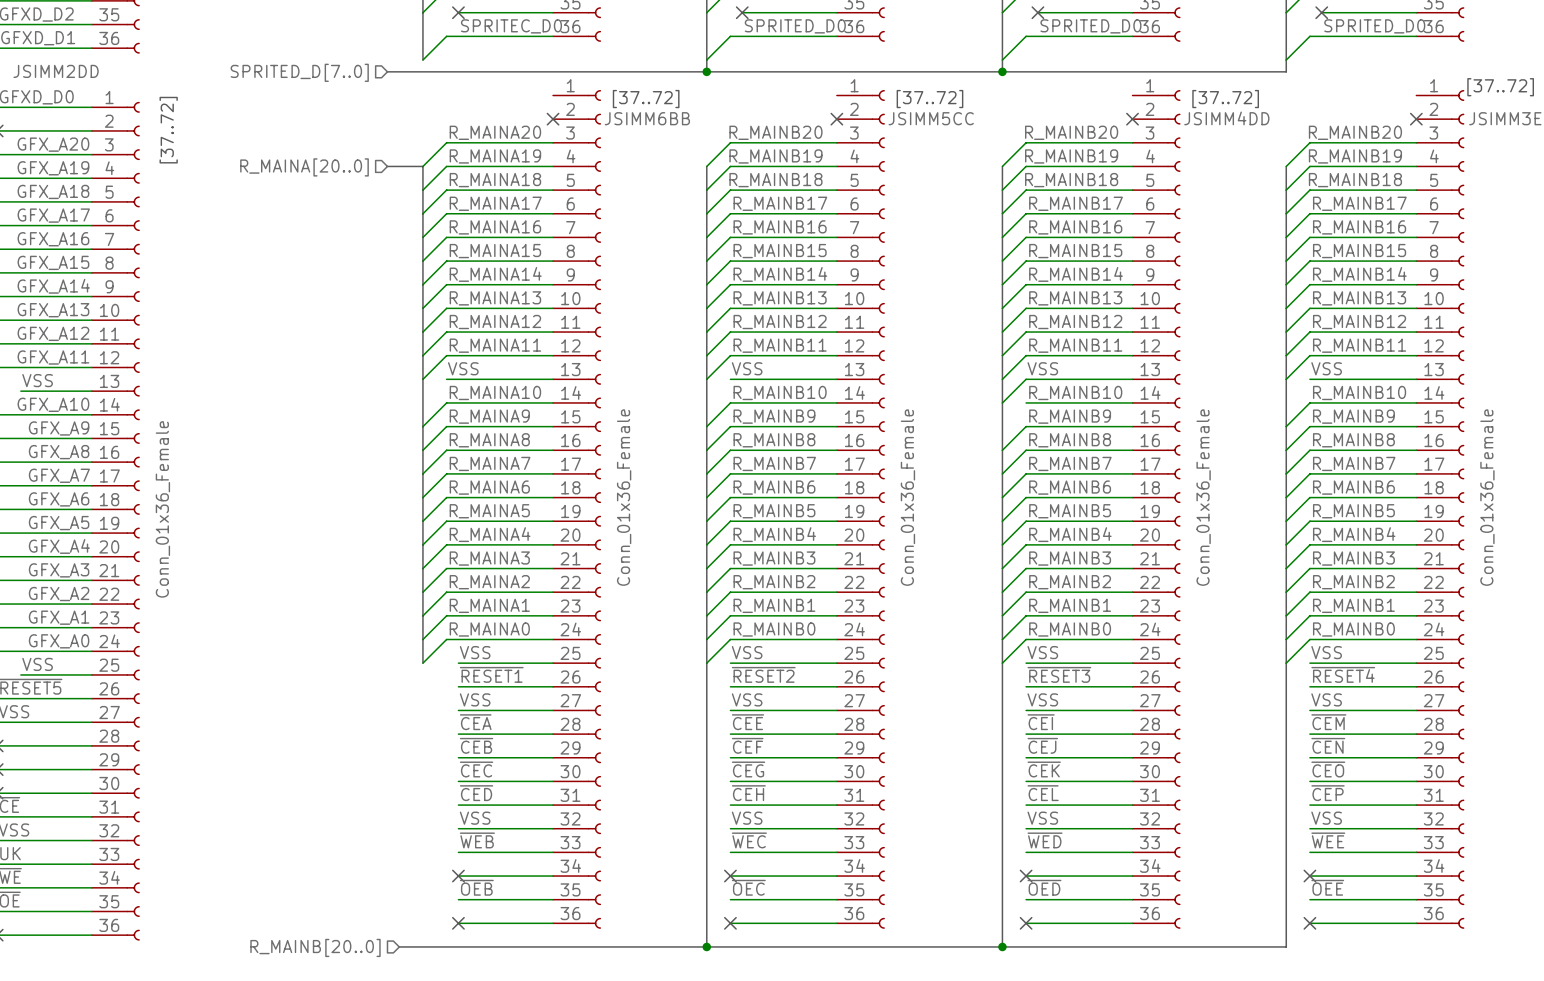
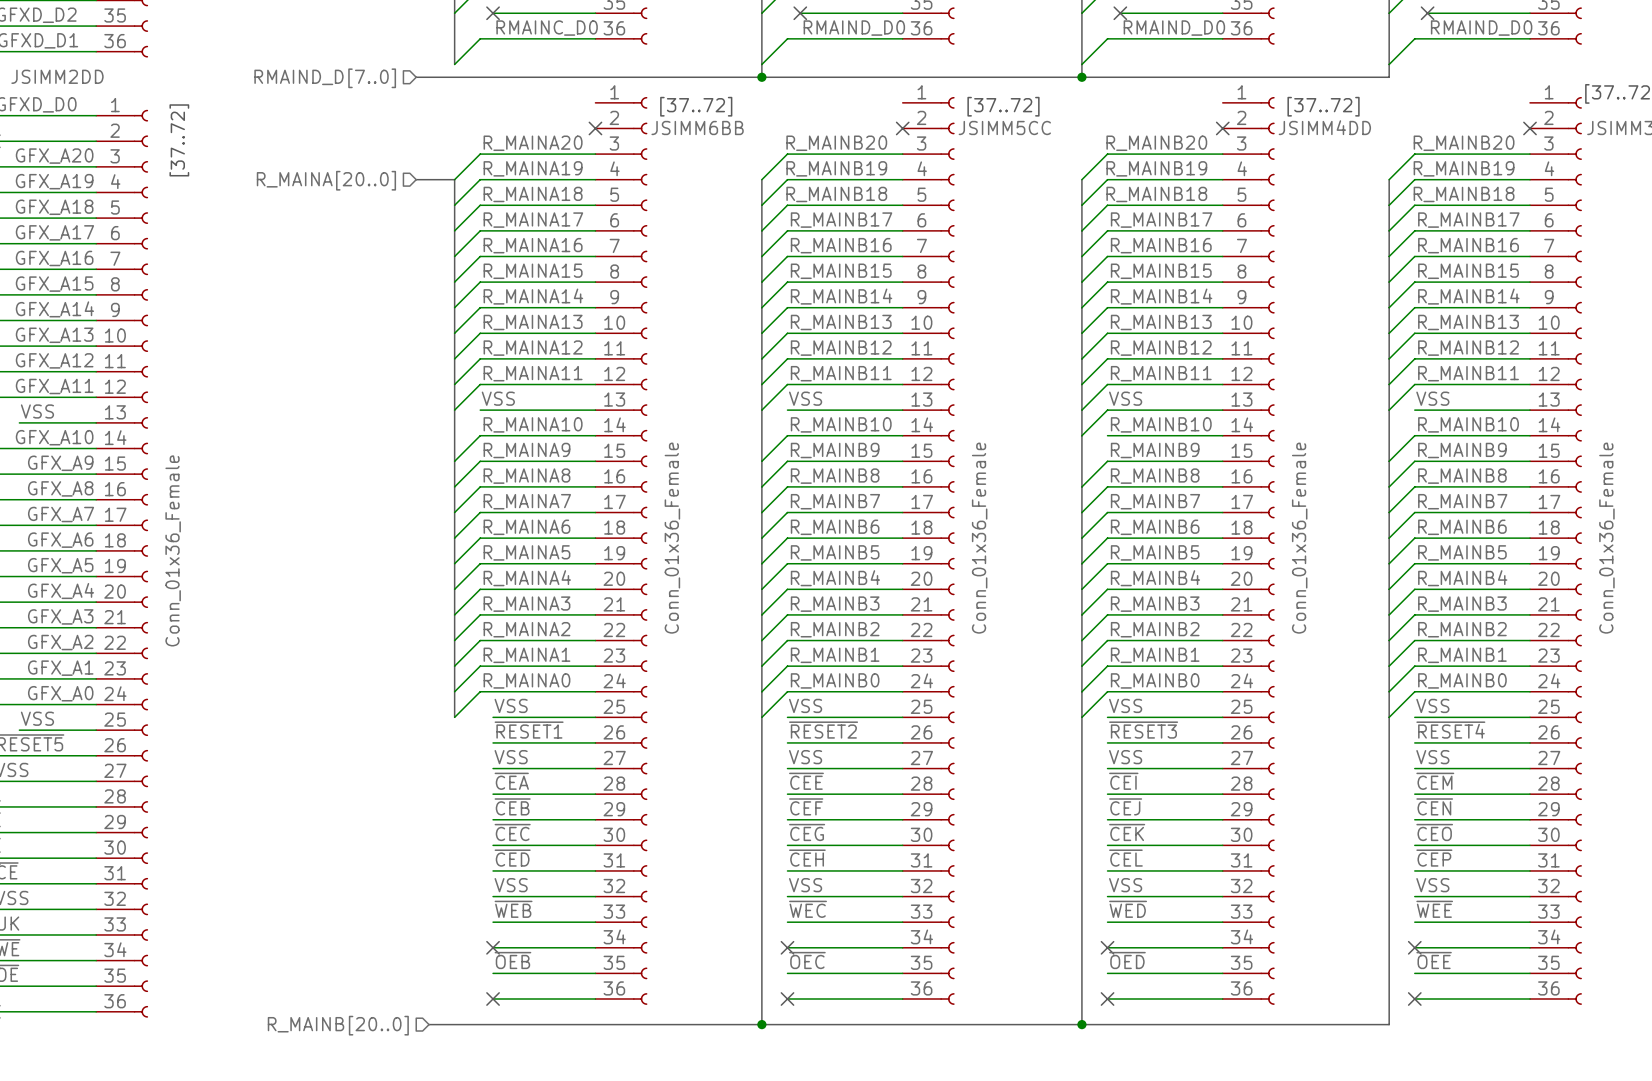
label: SPRITEC_D0 (511, 26) -> RMAINC_D0 (547, 28)
label: SPRITED_D0 (795, 26) -> RMAIND_D0 (854, 28)
label: SPRITED_D0 (1090, 26) -> RMAIND_D0 (1174, 28)
label: SPRITED_D0 (1374, 26) -> RMAIND_D0 (1481, 28)
hierarchical label: SPRITED_D[7..0] (299, 72) -> RMAIND_D[7..0] (325, 78)

